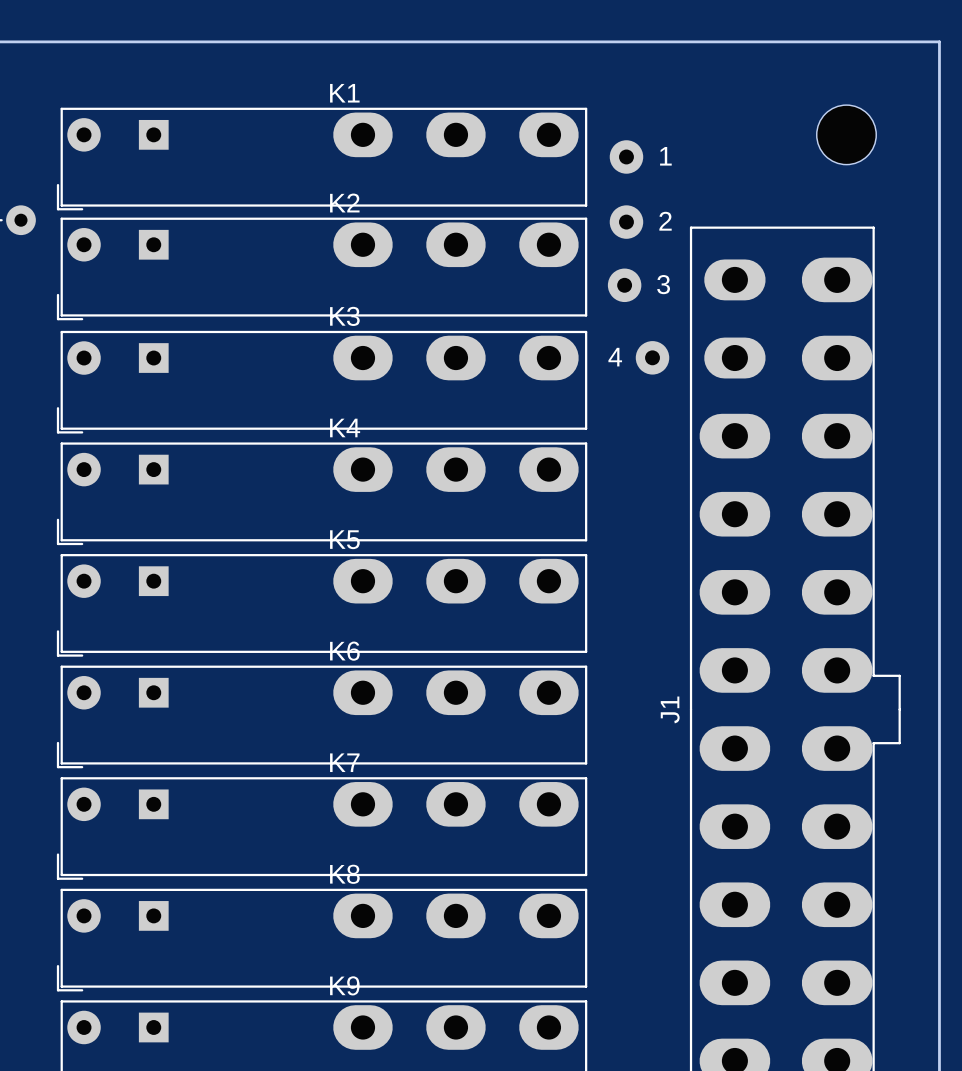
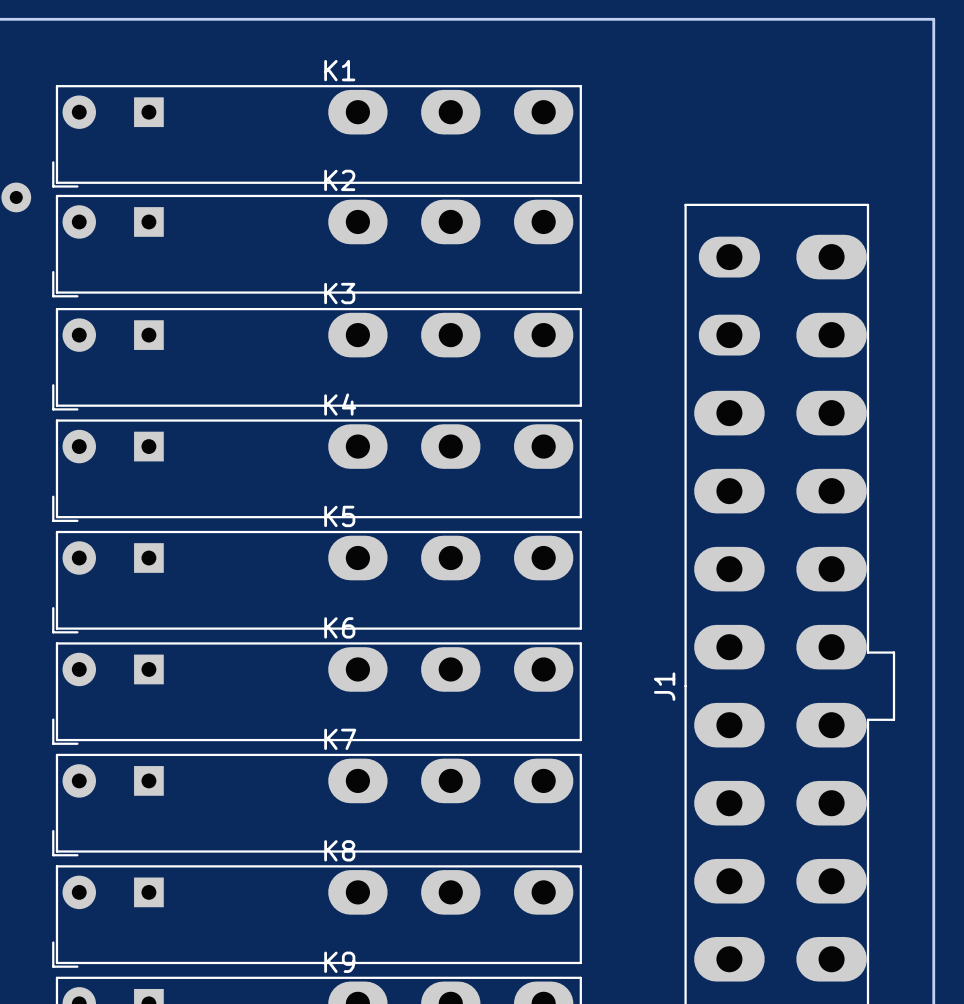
part: (846, 134) -> none
1: (626, 156) -> none
2: (626, 222) -> none
3: (624, 285) -> none
4: (652, 357) -> none

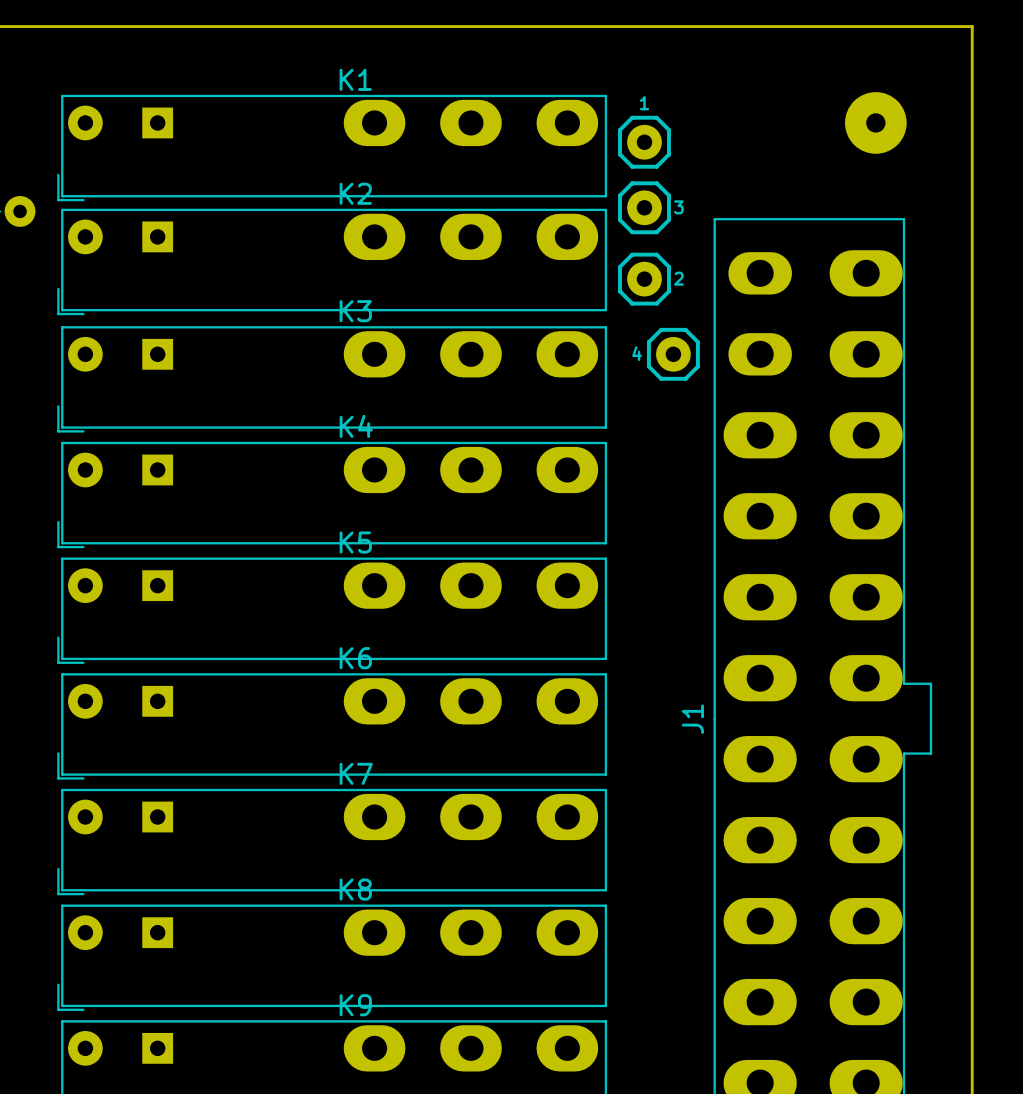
part: none -> (875, 122)
part: none -> 1 (644, 142)
part: none -> 3 (644, 207)
part: none -> 2 (644, 279)
part: none -> 4 (673, 354)

